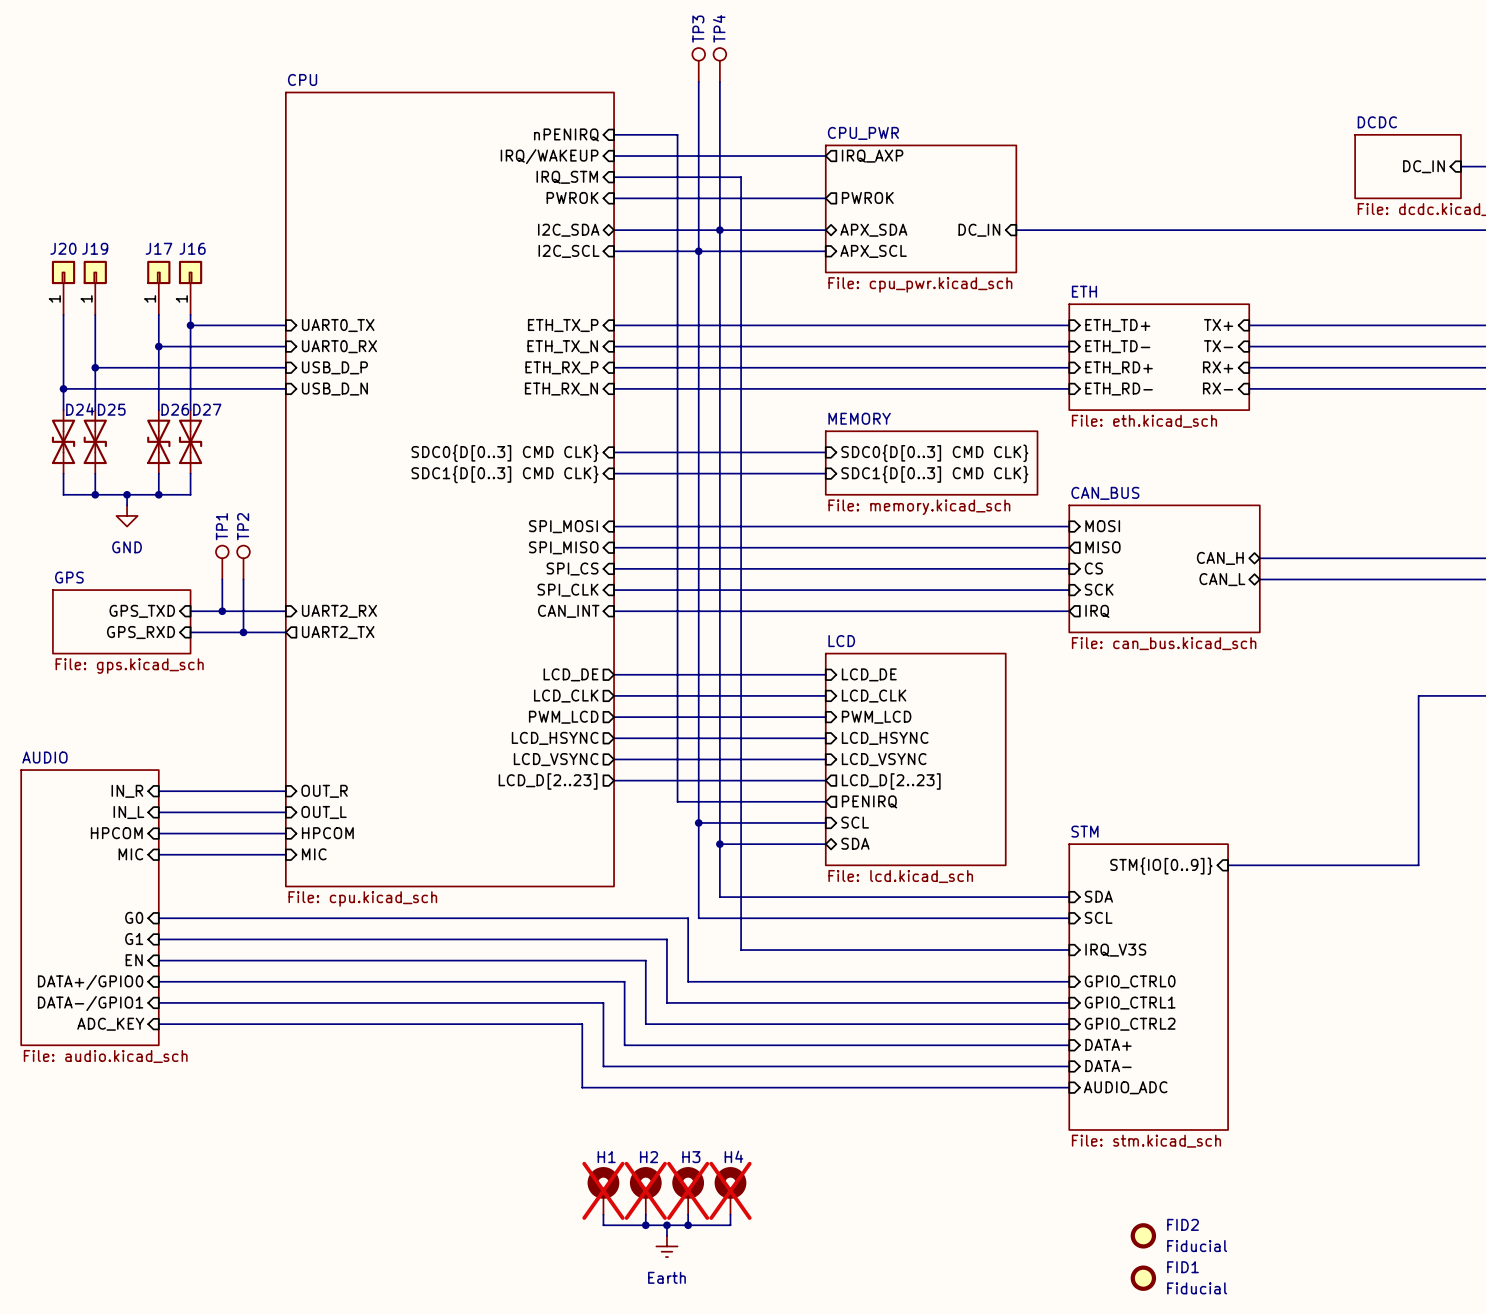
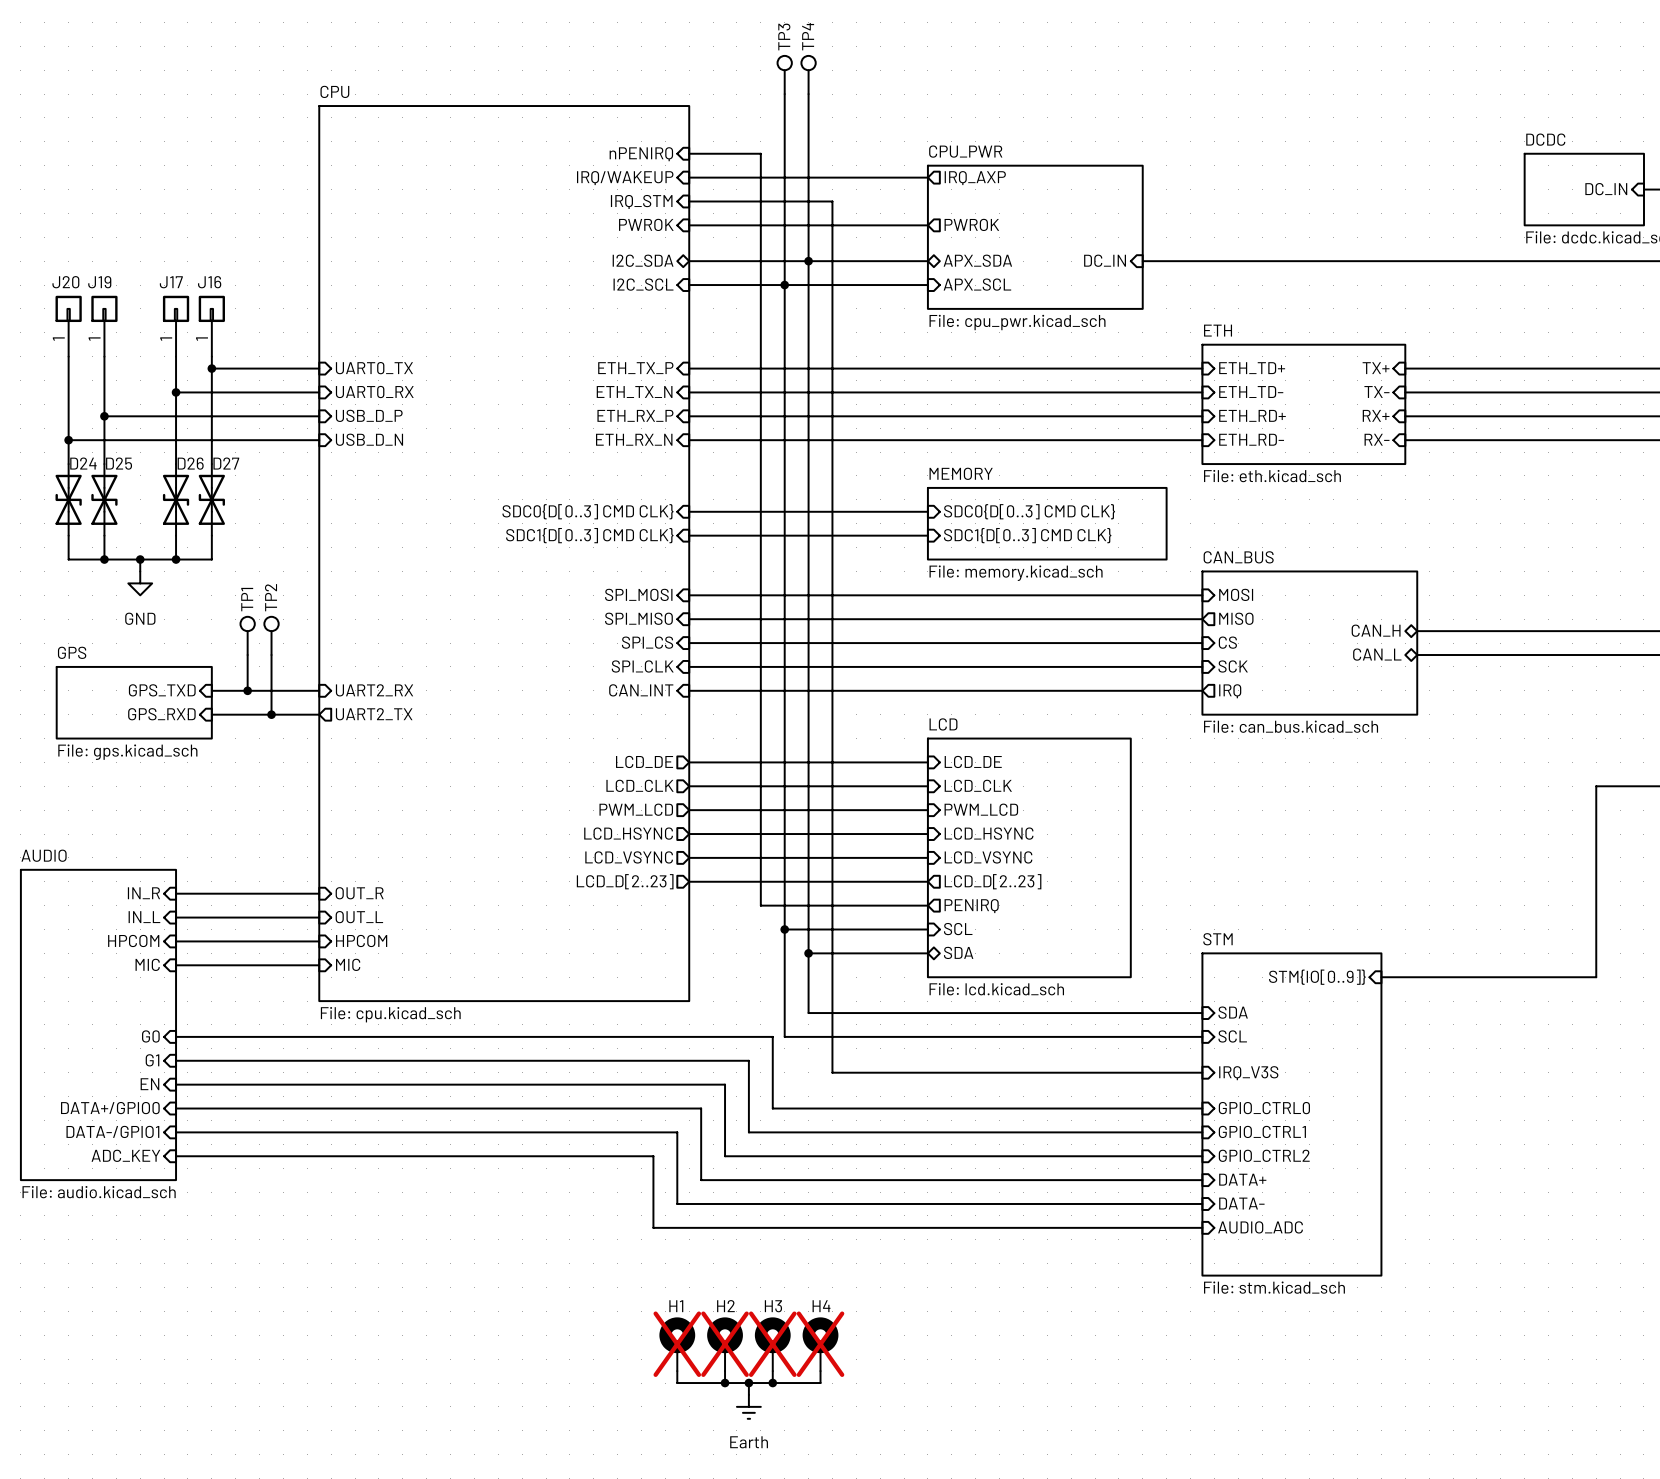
FID2: Fiducial (1143, 1235) -> none
FID1: Fiducial (1143, 1278) -> none

